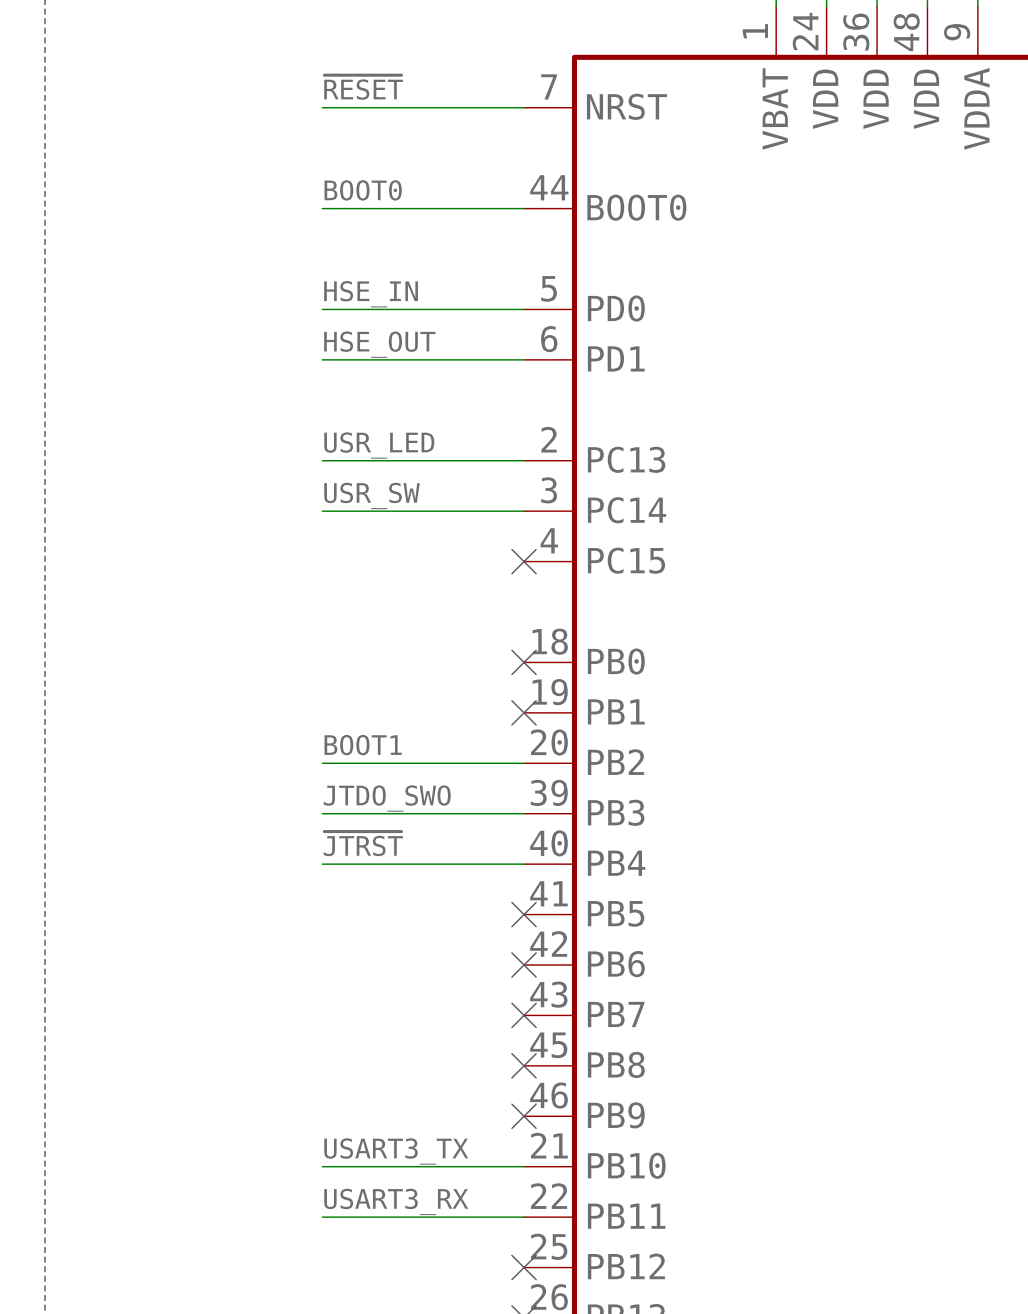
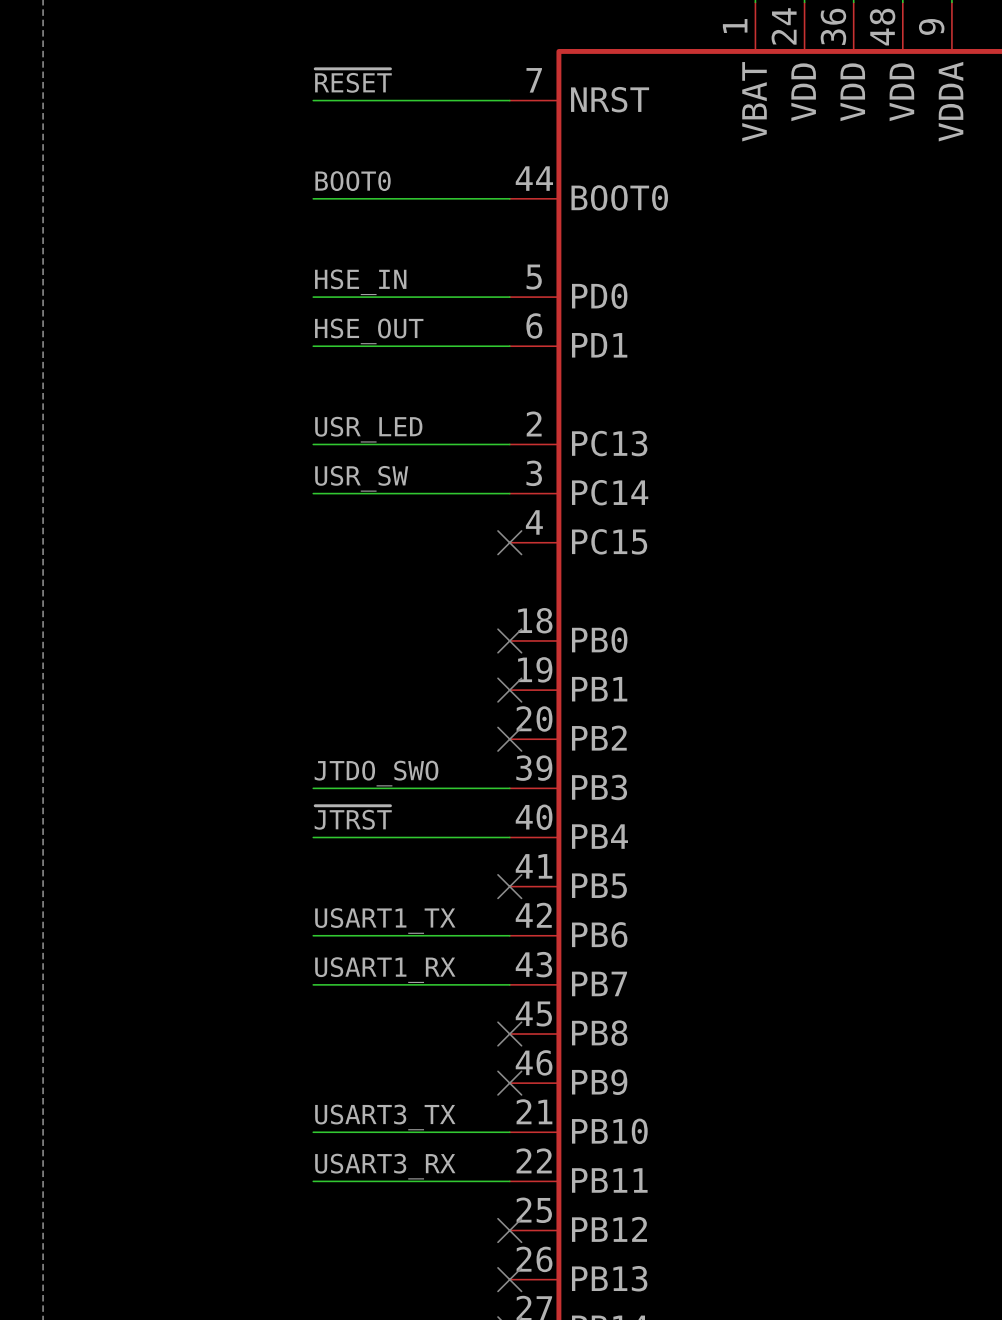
label: BOOT1 (363, 745) -> none
wire: (322, 763) (524, 763) -> (313, 935) (509, 935)
no-connect mark: none -> (509, 739)
label: none -> USART1_TX (385, 920)
no-connect mark: (524, 965) -> none
label: none -> USART1_RX (385, 970)
wire: none -> (313, 984) (509, 984)
no-connect mark: (524, 1015) -> none

